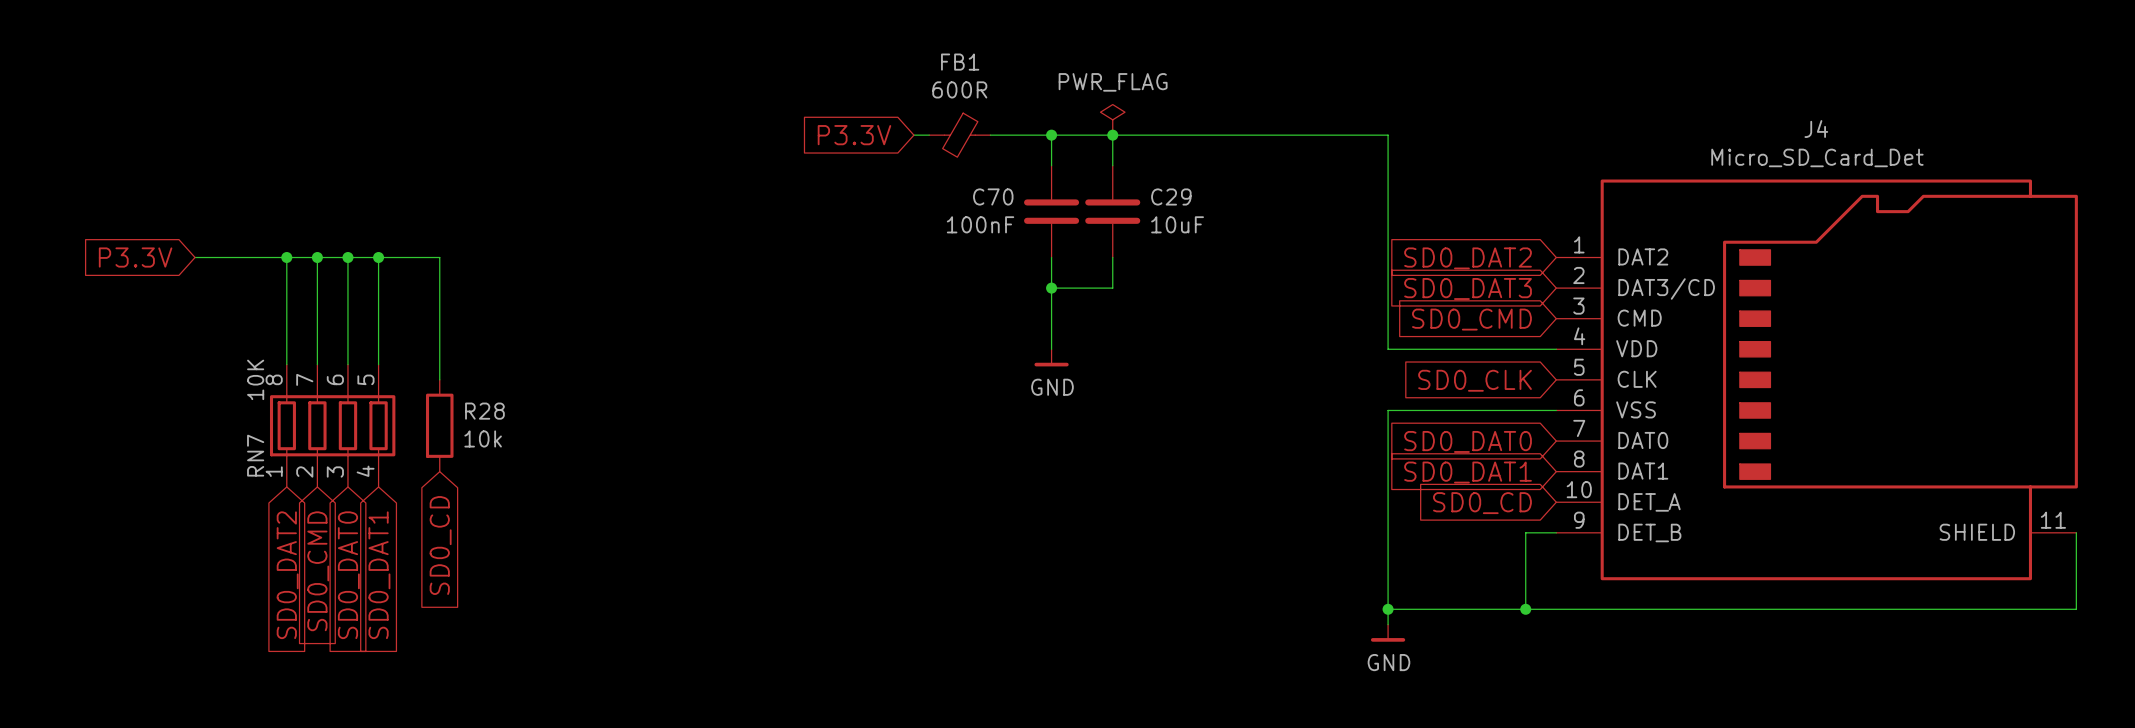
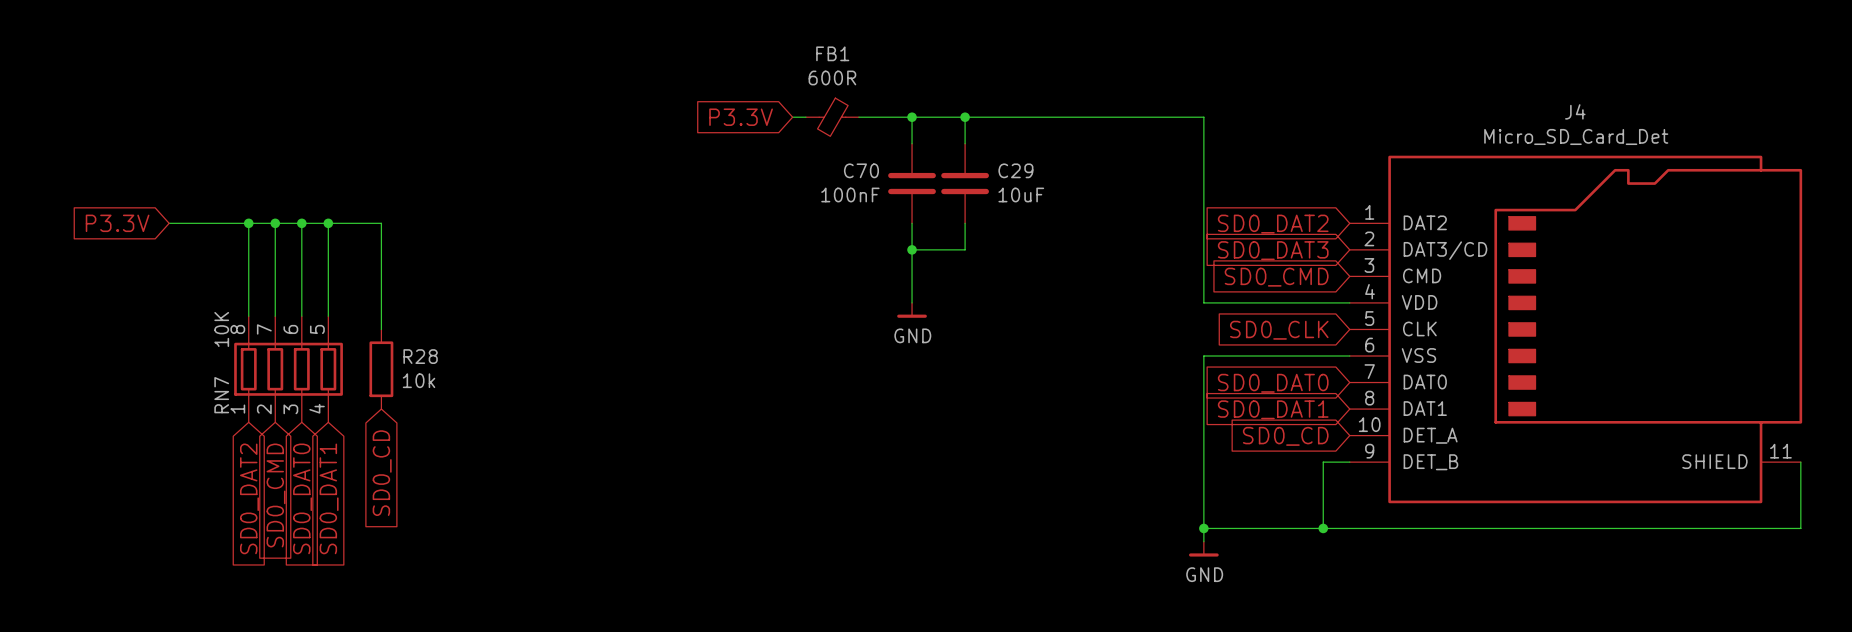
power symbol: PWR_FLAG (1112, 119) -> none

